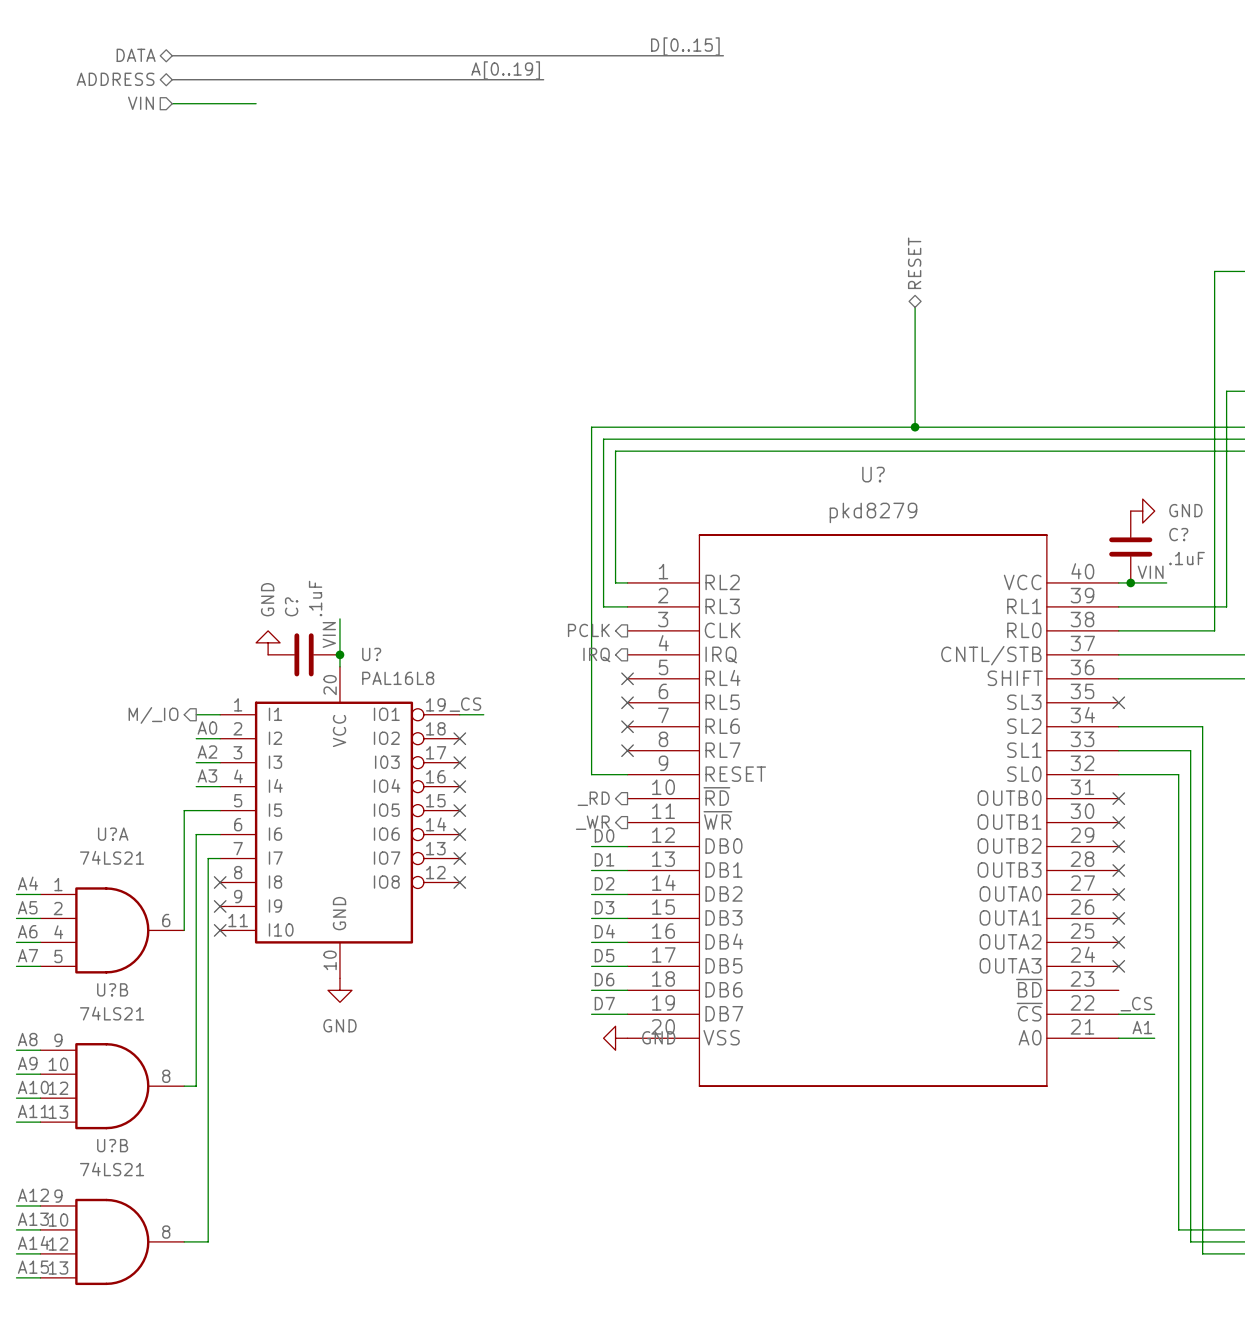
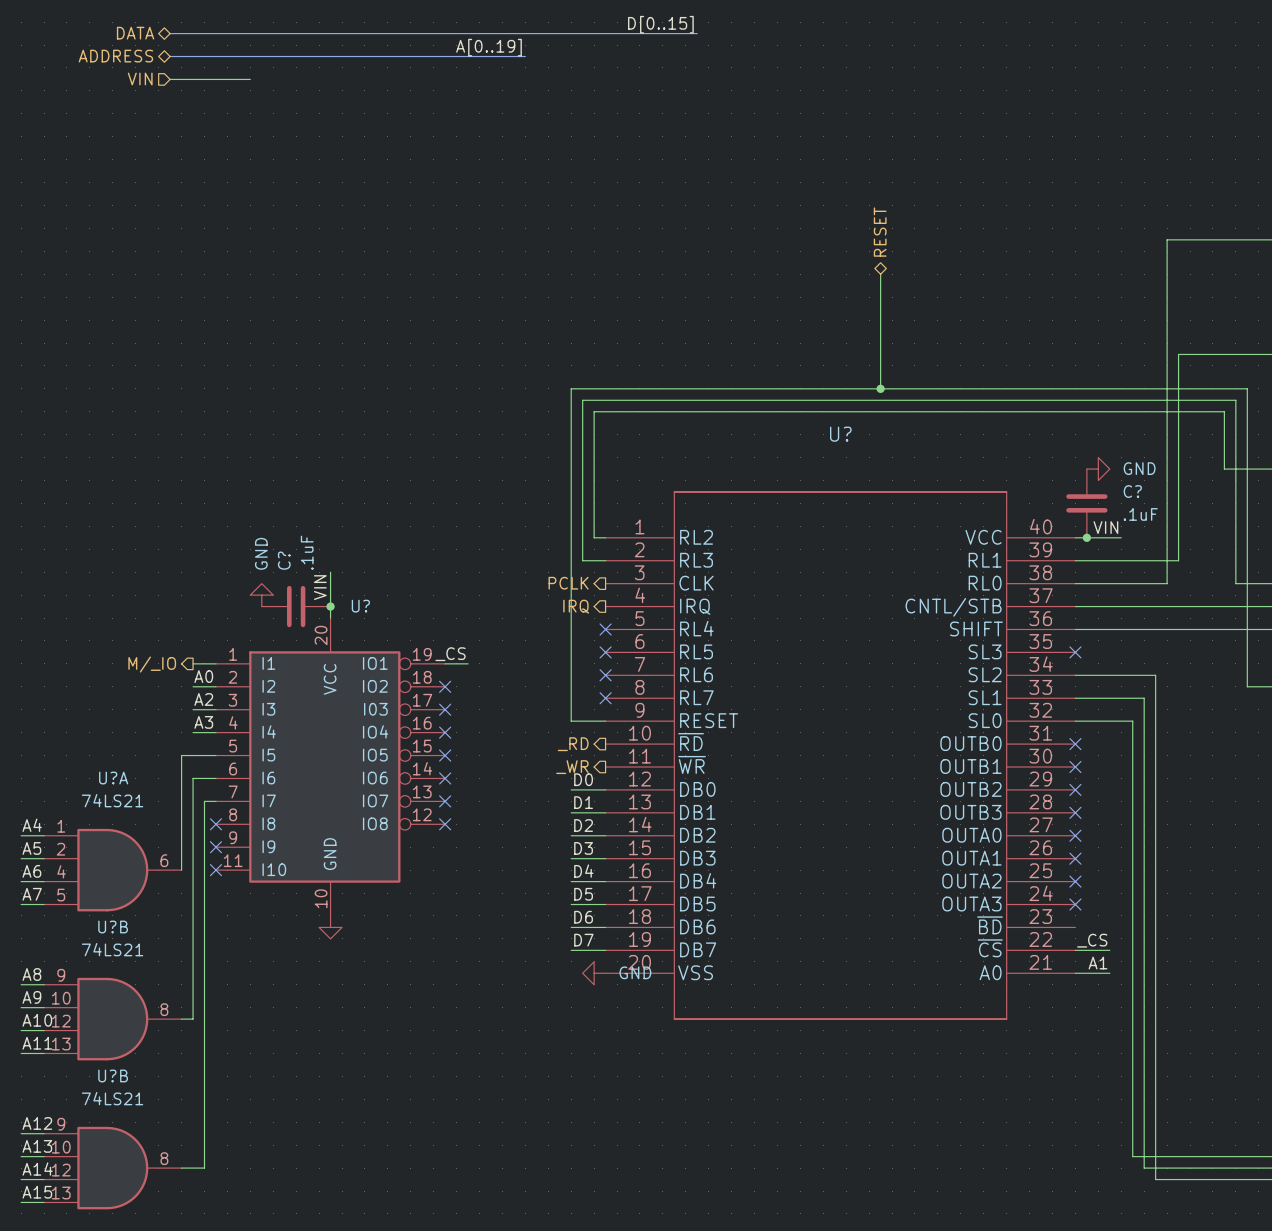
U? value: pkd8279 (873, 512) -> none
U? value: PAL16L8 (398, 678) -> none
power symbol text: GND (339, 1025) -> none

